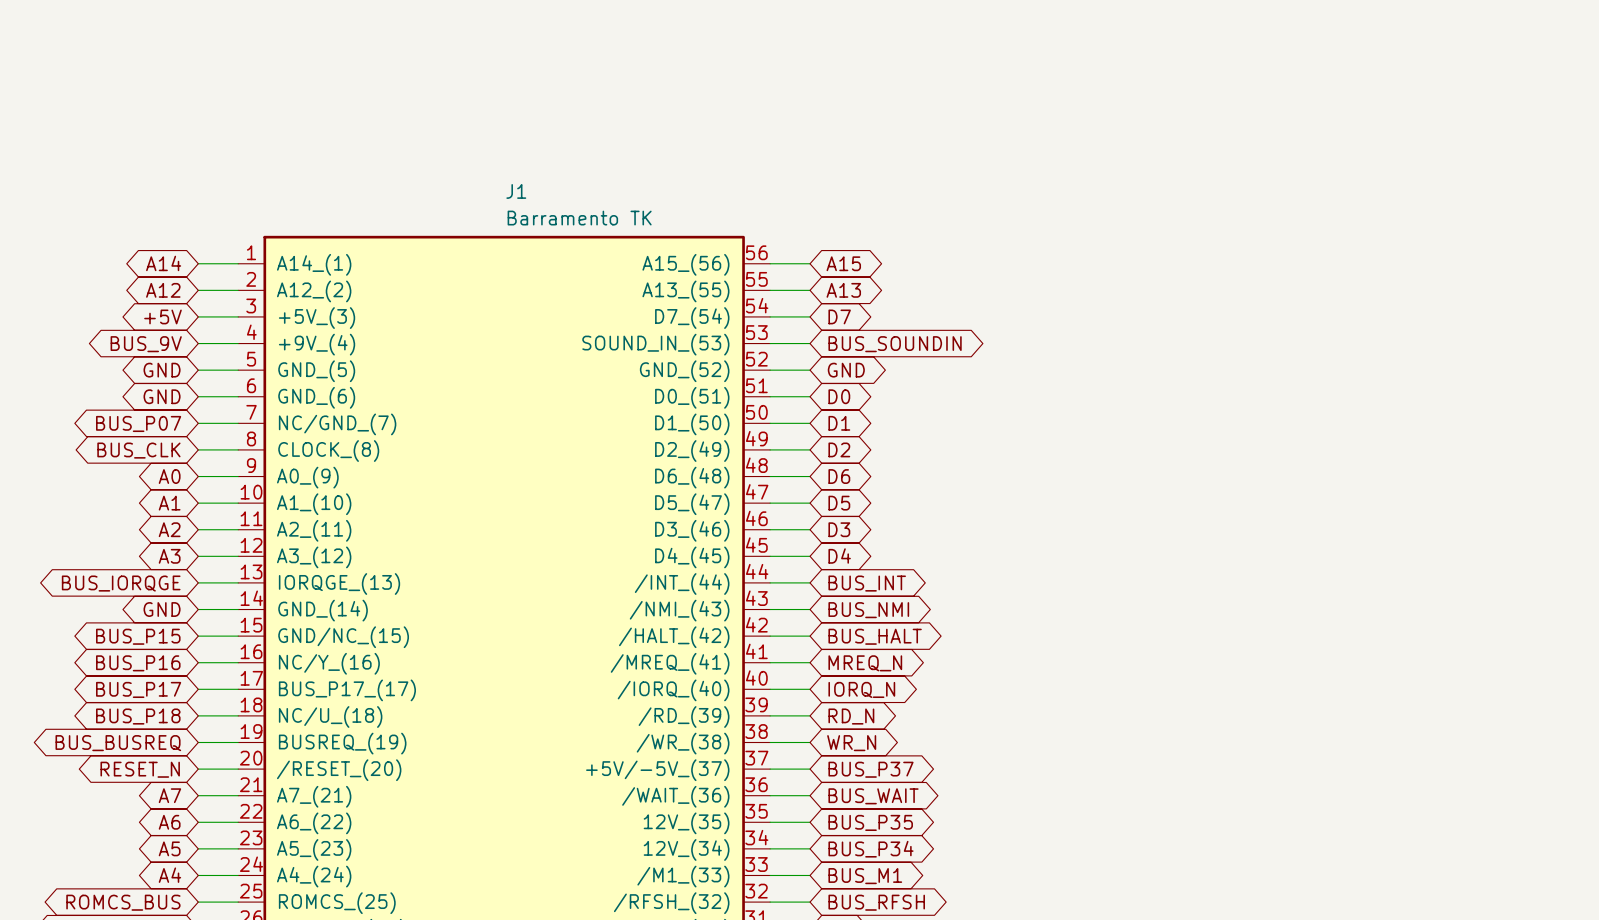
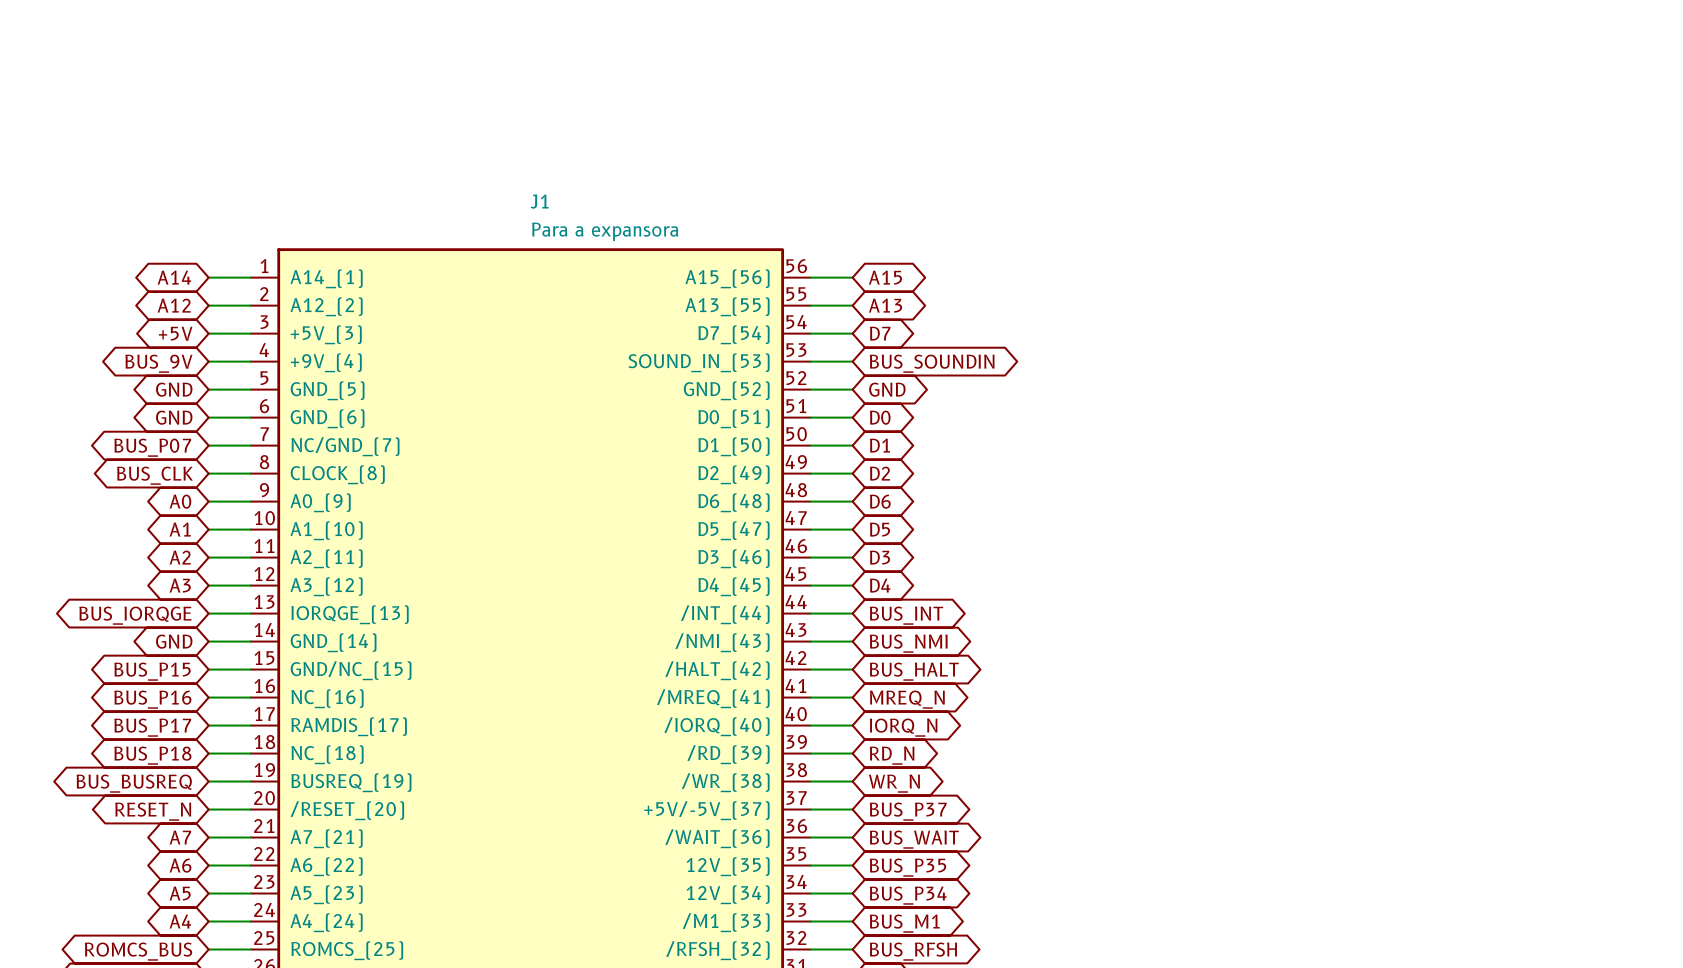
J1 value: Barramento TK (579, 218) -> Para a expansora (605, 231)
J1 pin name: NC/Y_(16) (329, 663) -> NC_(16) (327, 698)
J1 pin name: BUS_P17_(17) (347, 690) -> RAMDIS_(17) (349, 726)
J1 pin name: NC/U_(18) (330, 716) -> NC_(18) (327, 754)

